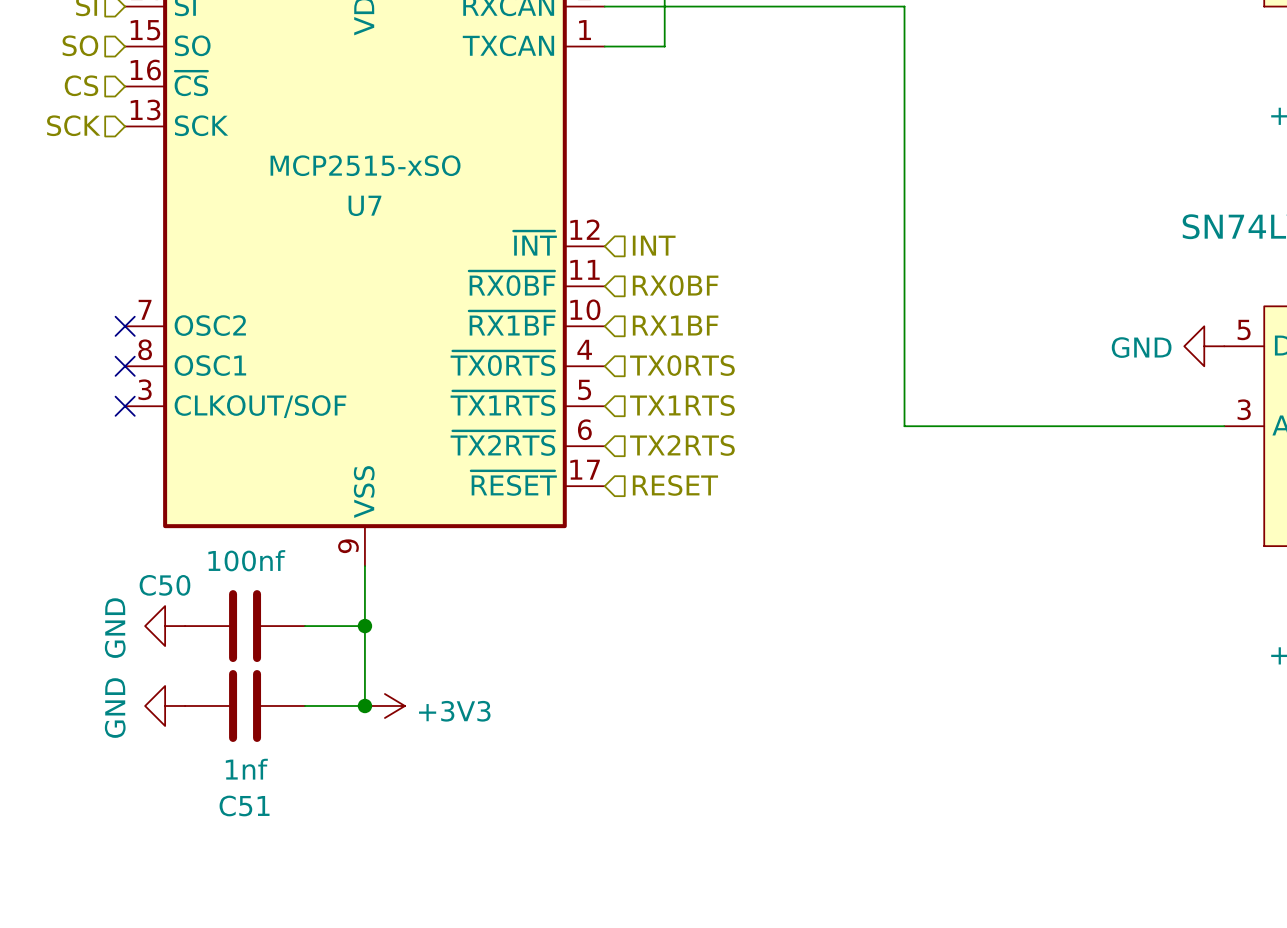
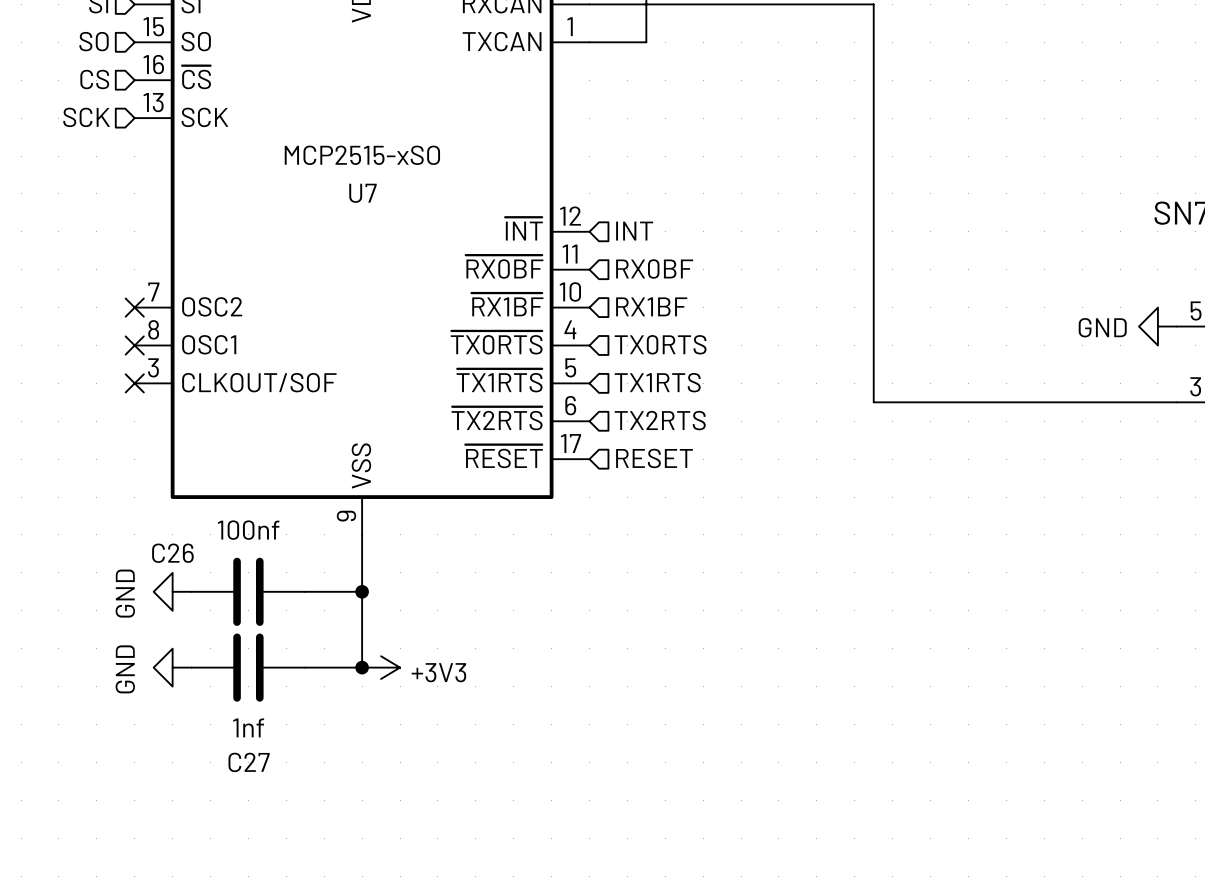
C50 name: C50 (164, 585) -> C26 (172, 553)
C51 name: C51 (244, 805) -> C27 (249, 762)

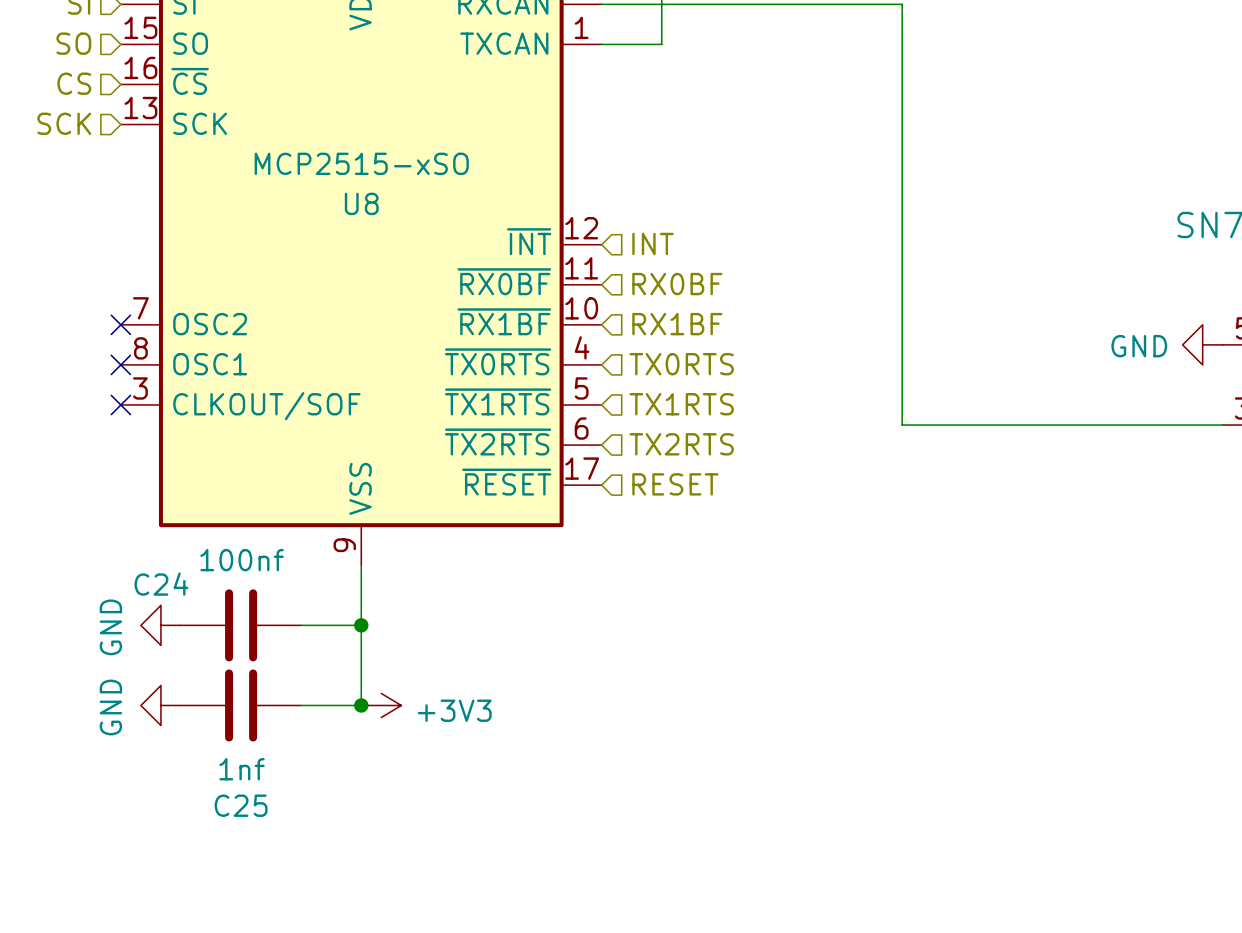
U7 name: U7 (362, 193) -> U8 (361, 203)
C26 name: C26 (172, 553) -> C24 (161, 584)
C27 name: C27 (249, 762) -> C25 (241, 805)

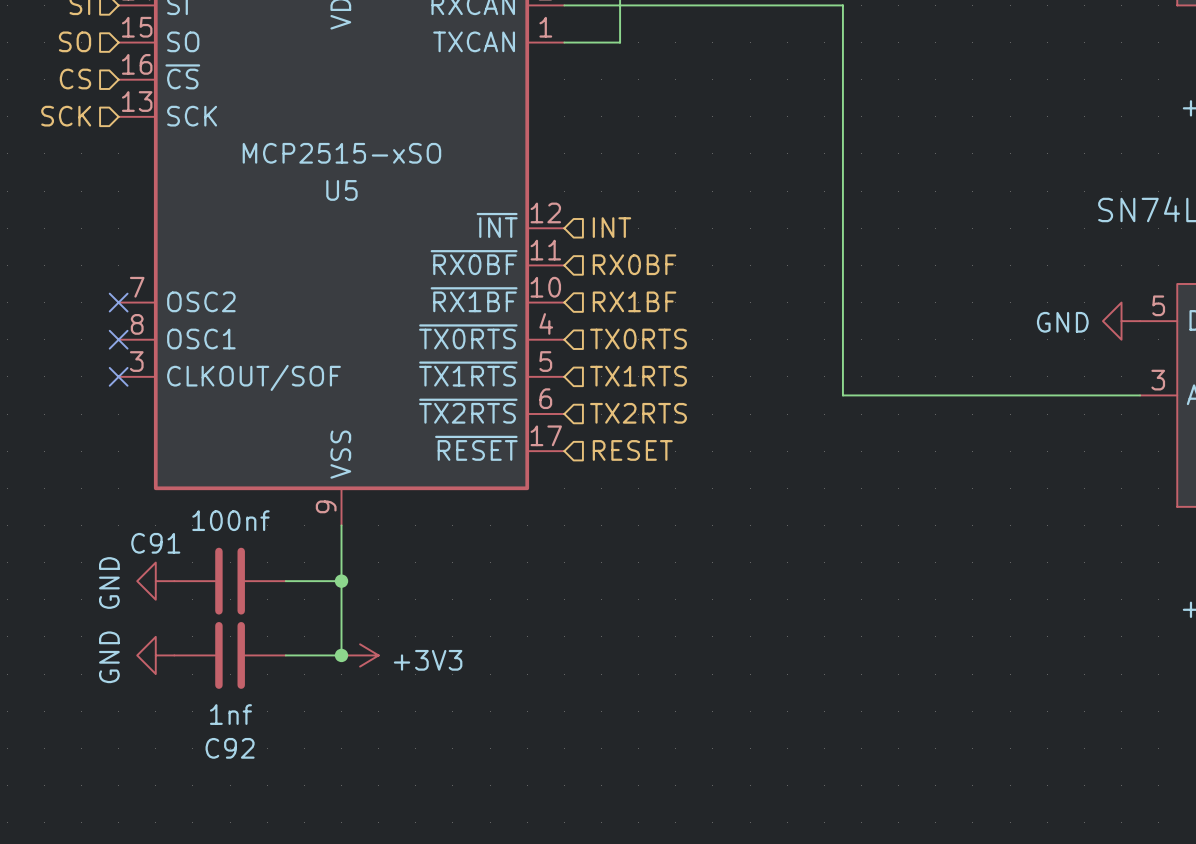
U8 name: U8 (361, 203) -> U5 (341, 190)
C24 name: C24 (161, 584) -> C91 (155, 543)
C25 name: C25 (241, 805) -> C92 (230, 748)

